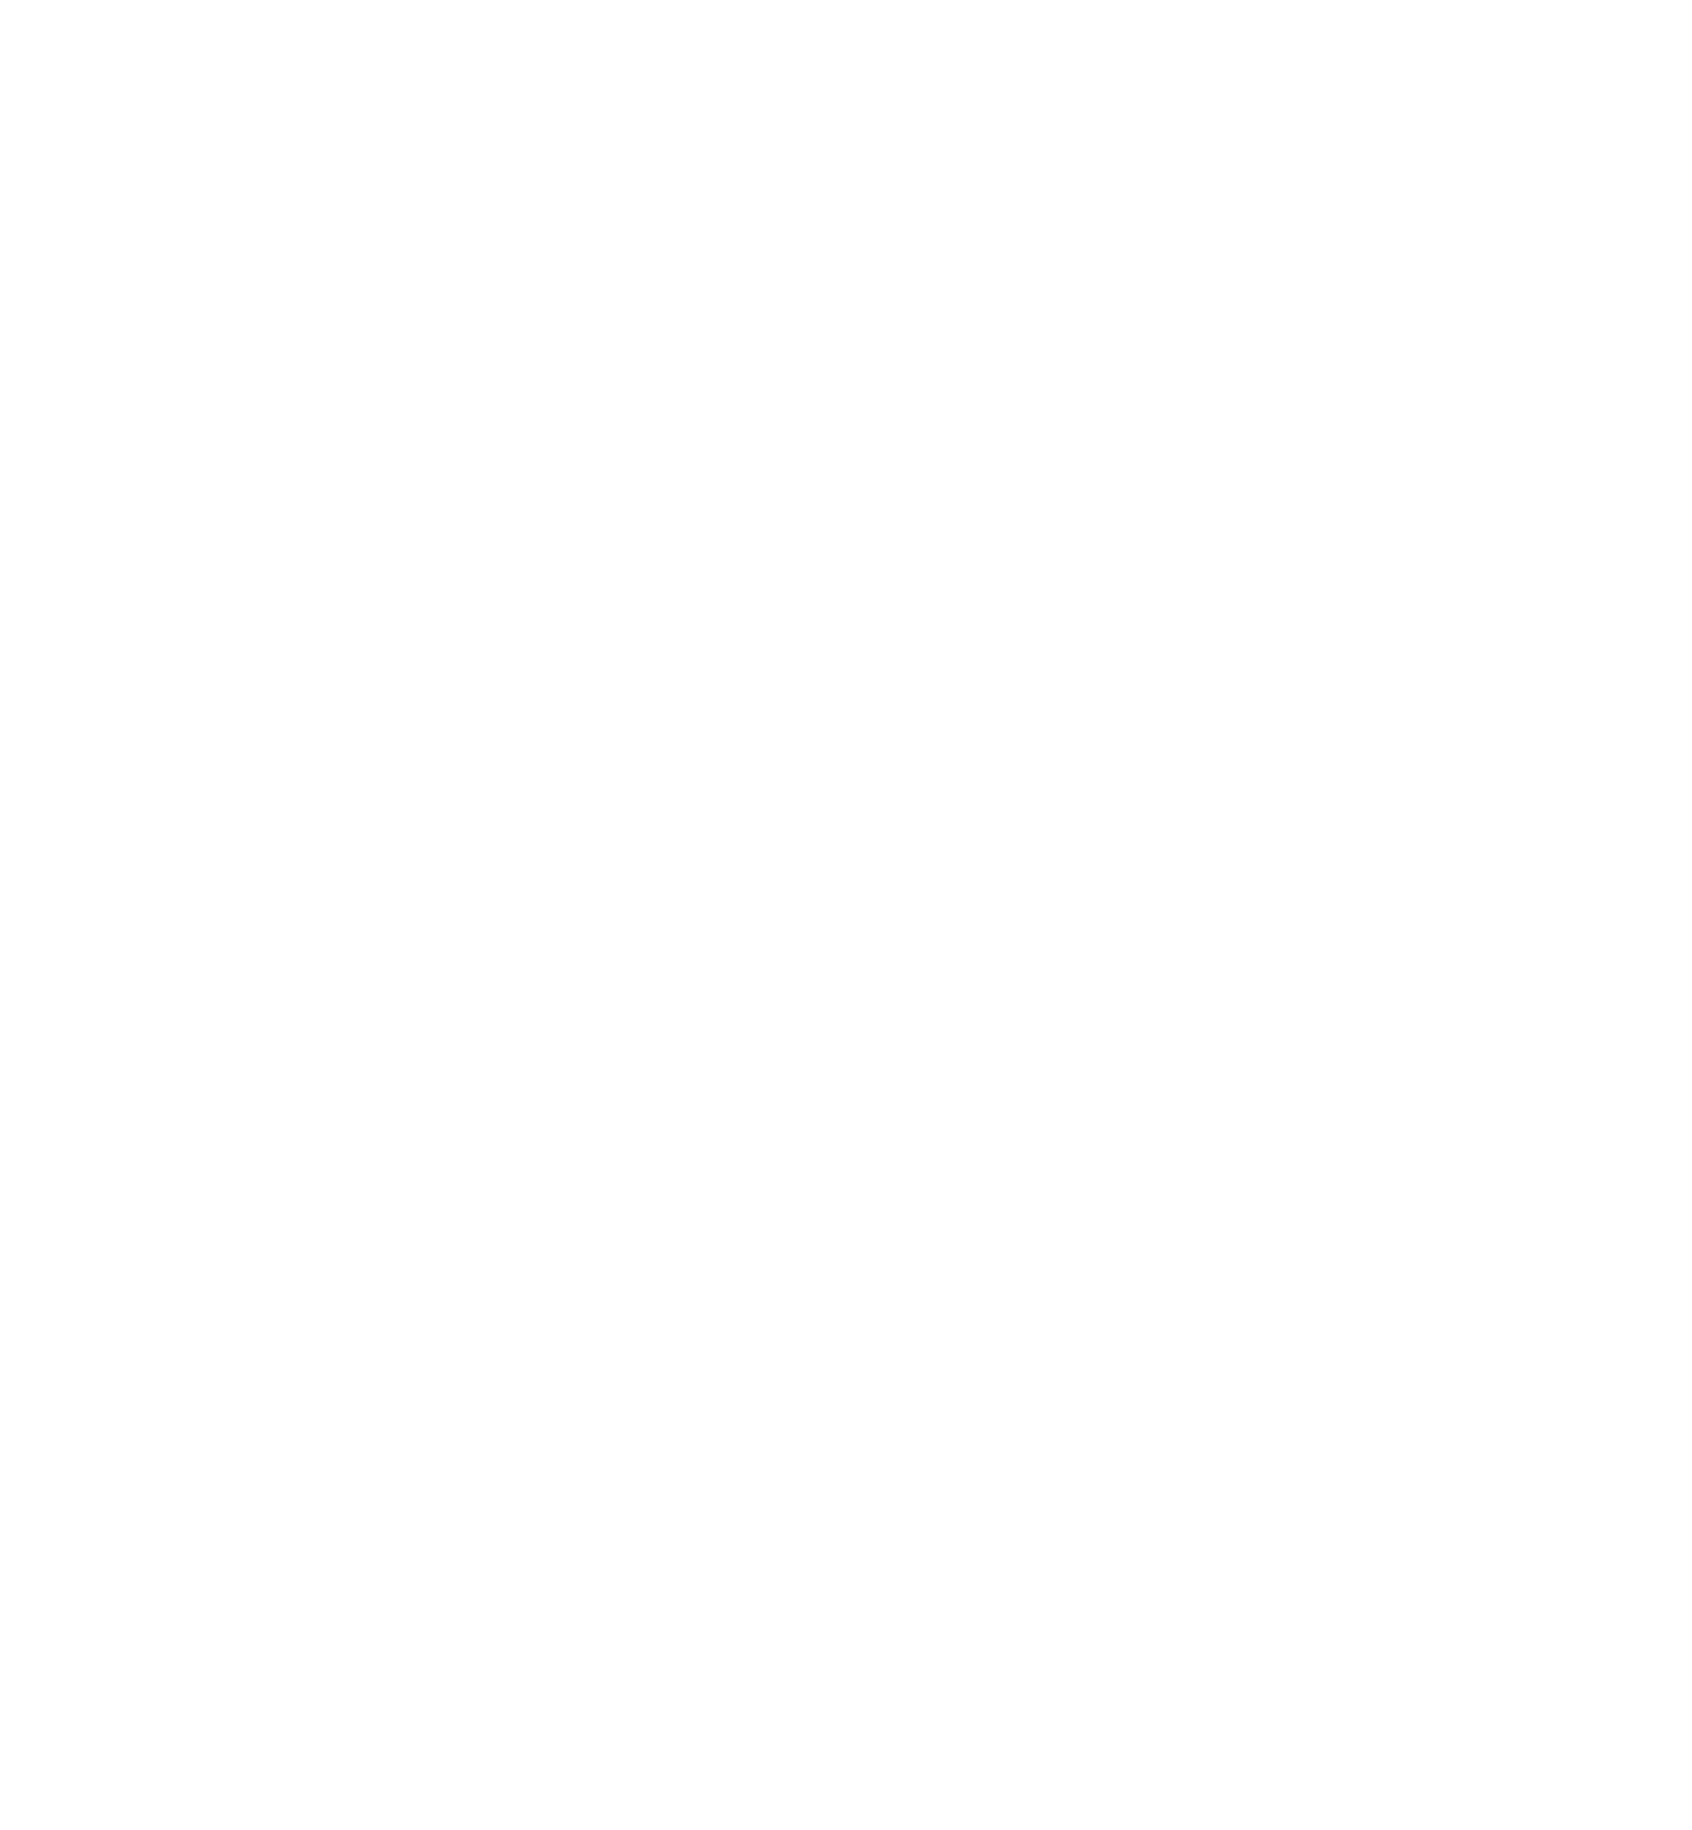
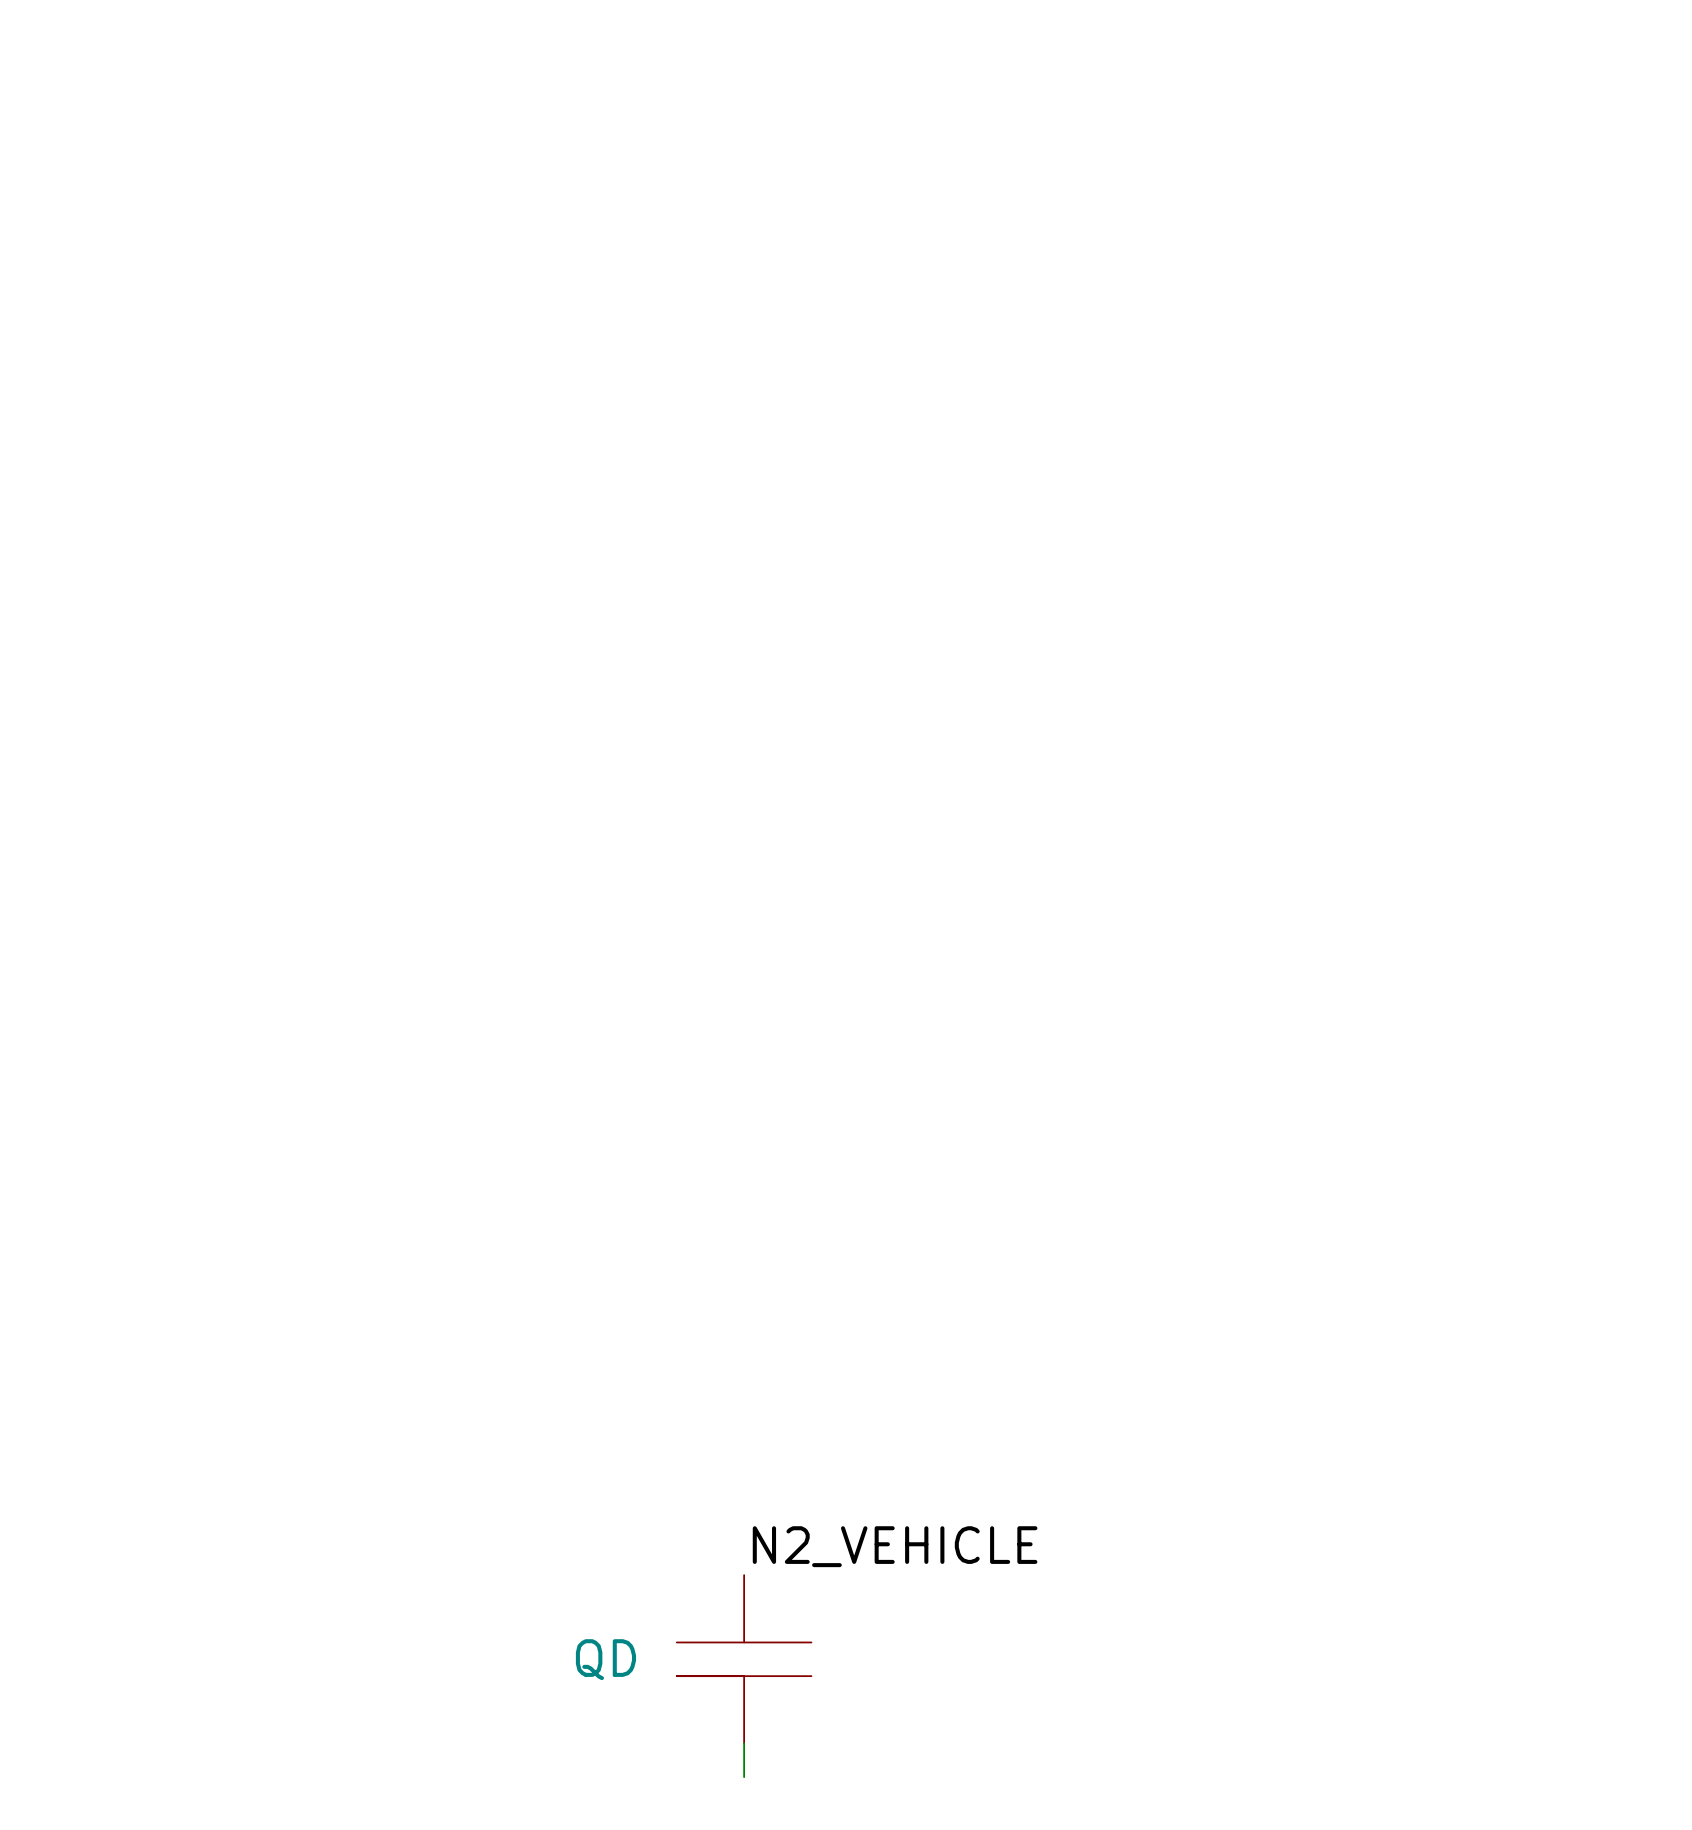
label: none -> N2_VEHICLE (895, 1546)
QD: none -> (744, 1659)
wire: none -> (744, 1743) (744, 1777)

